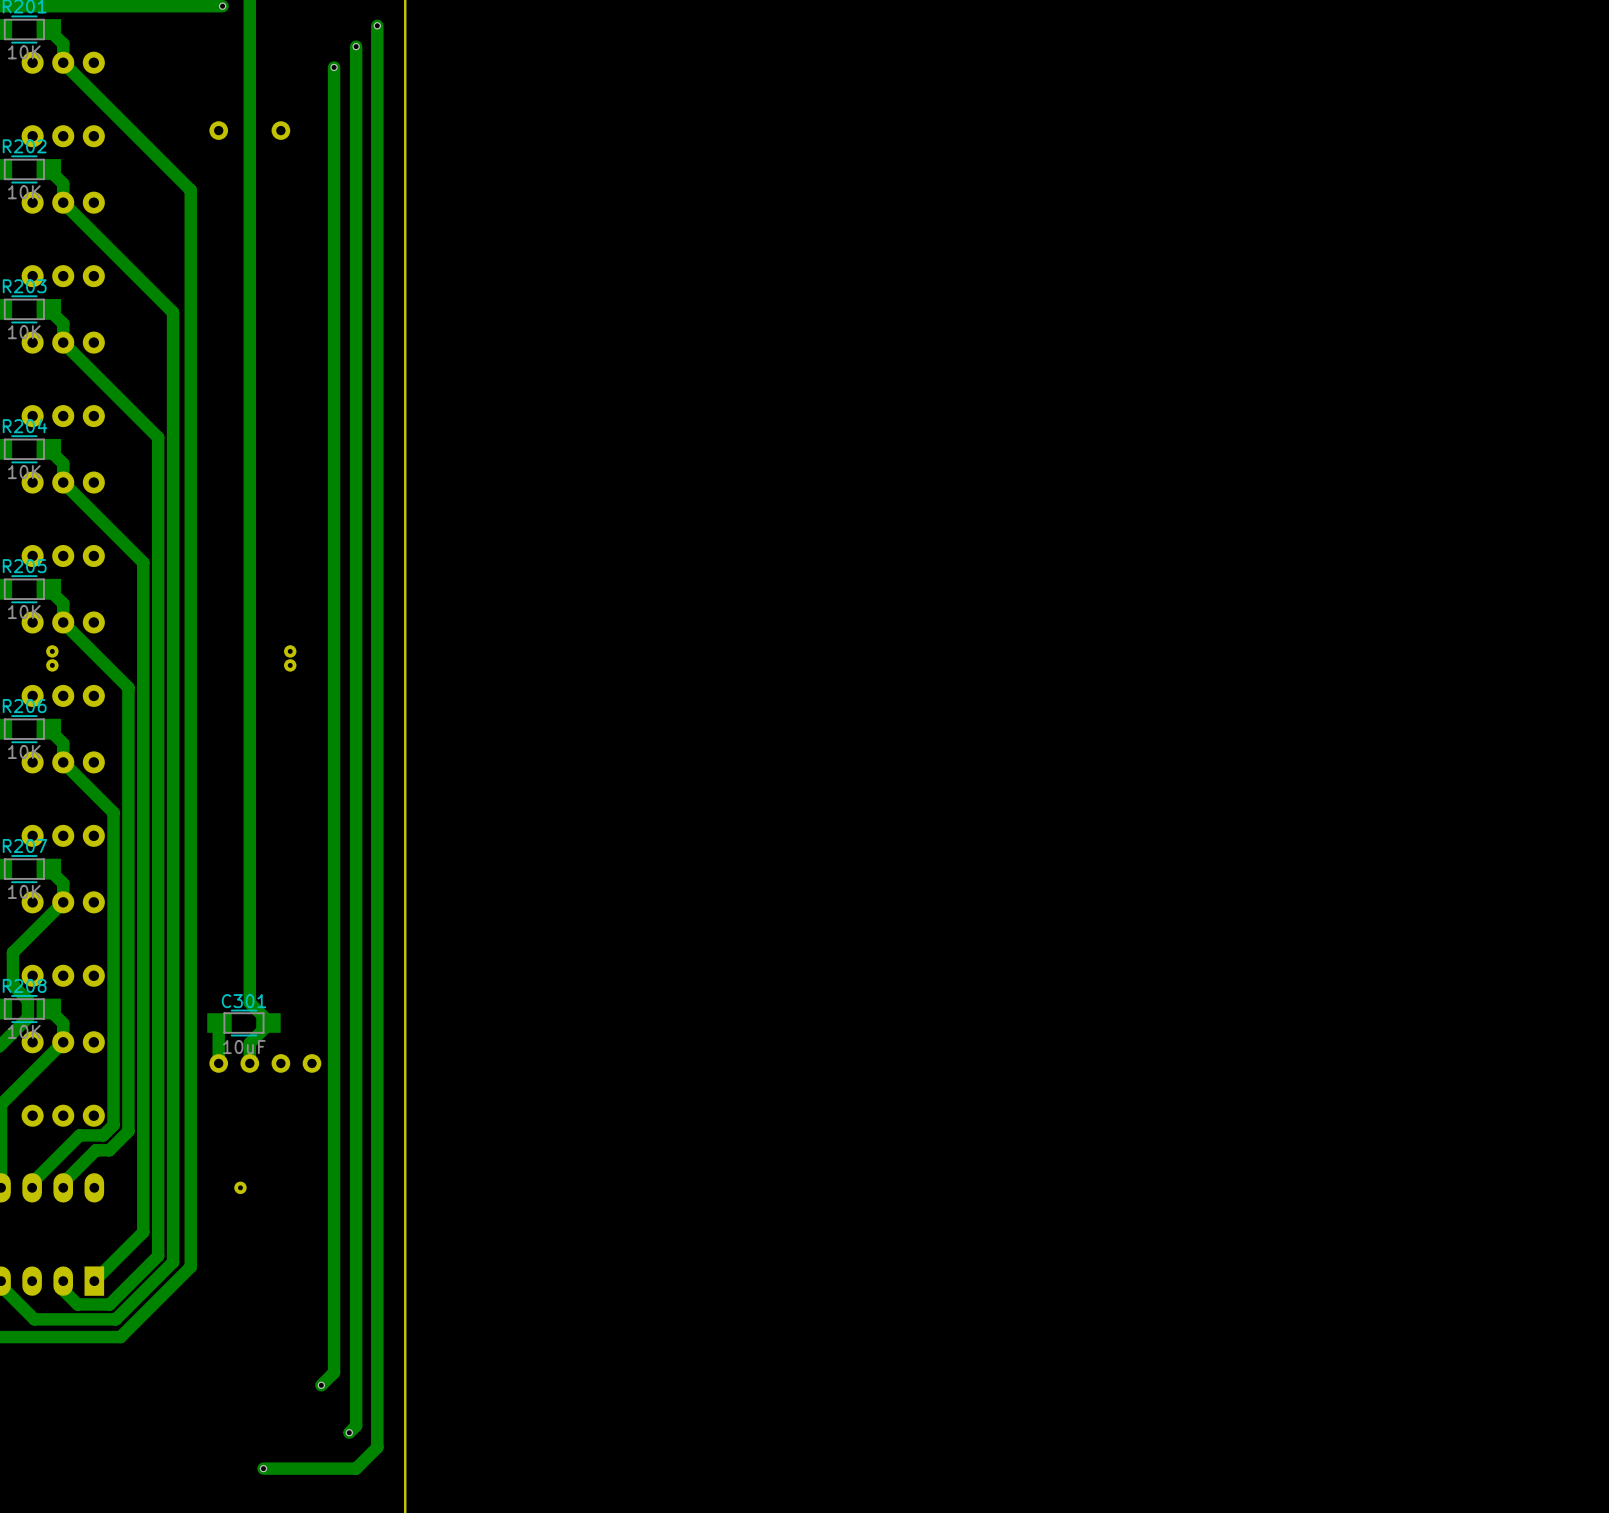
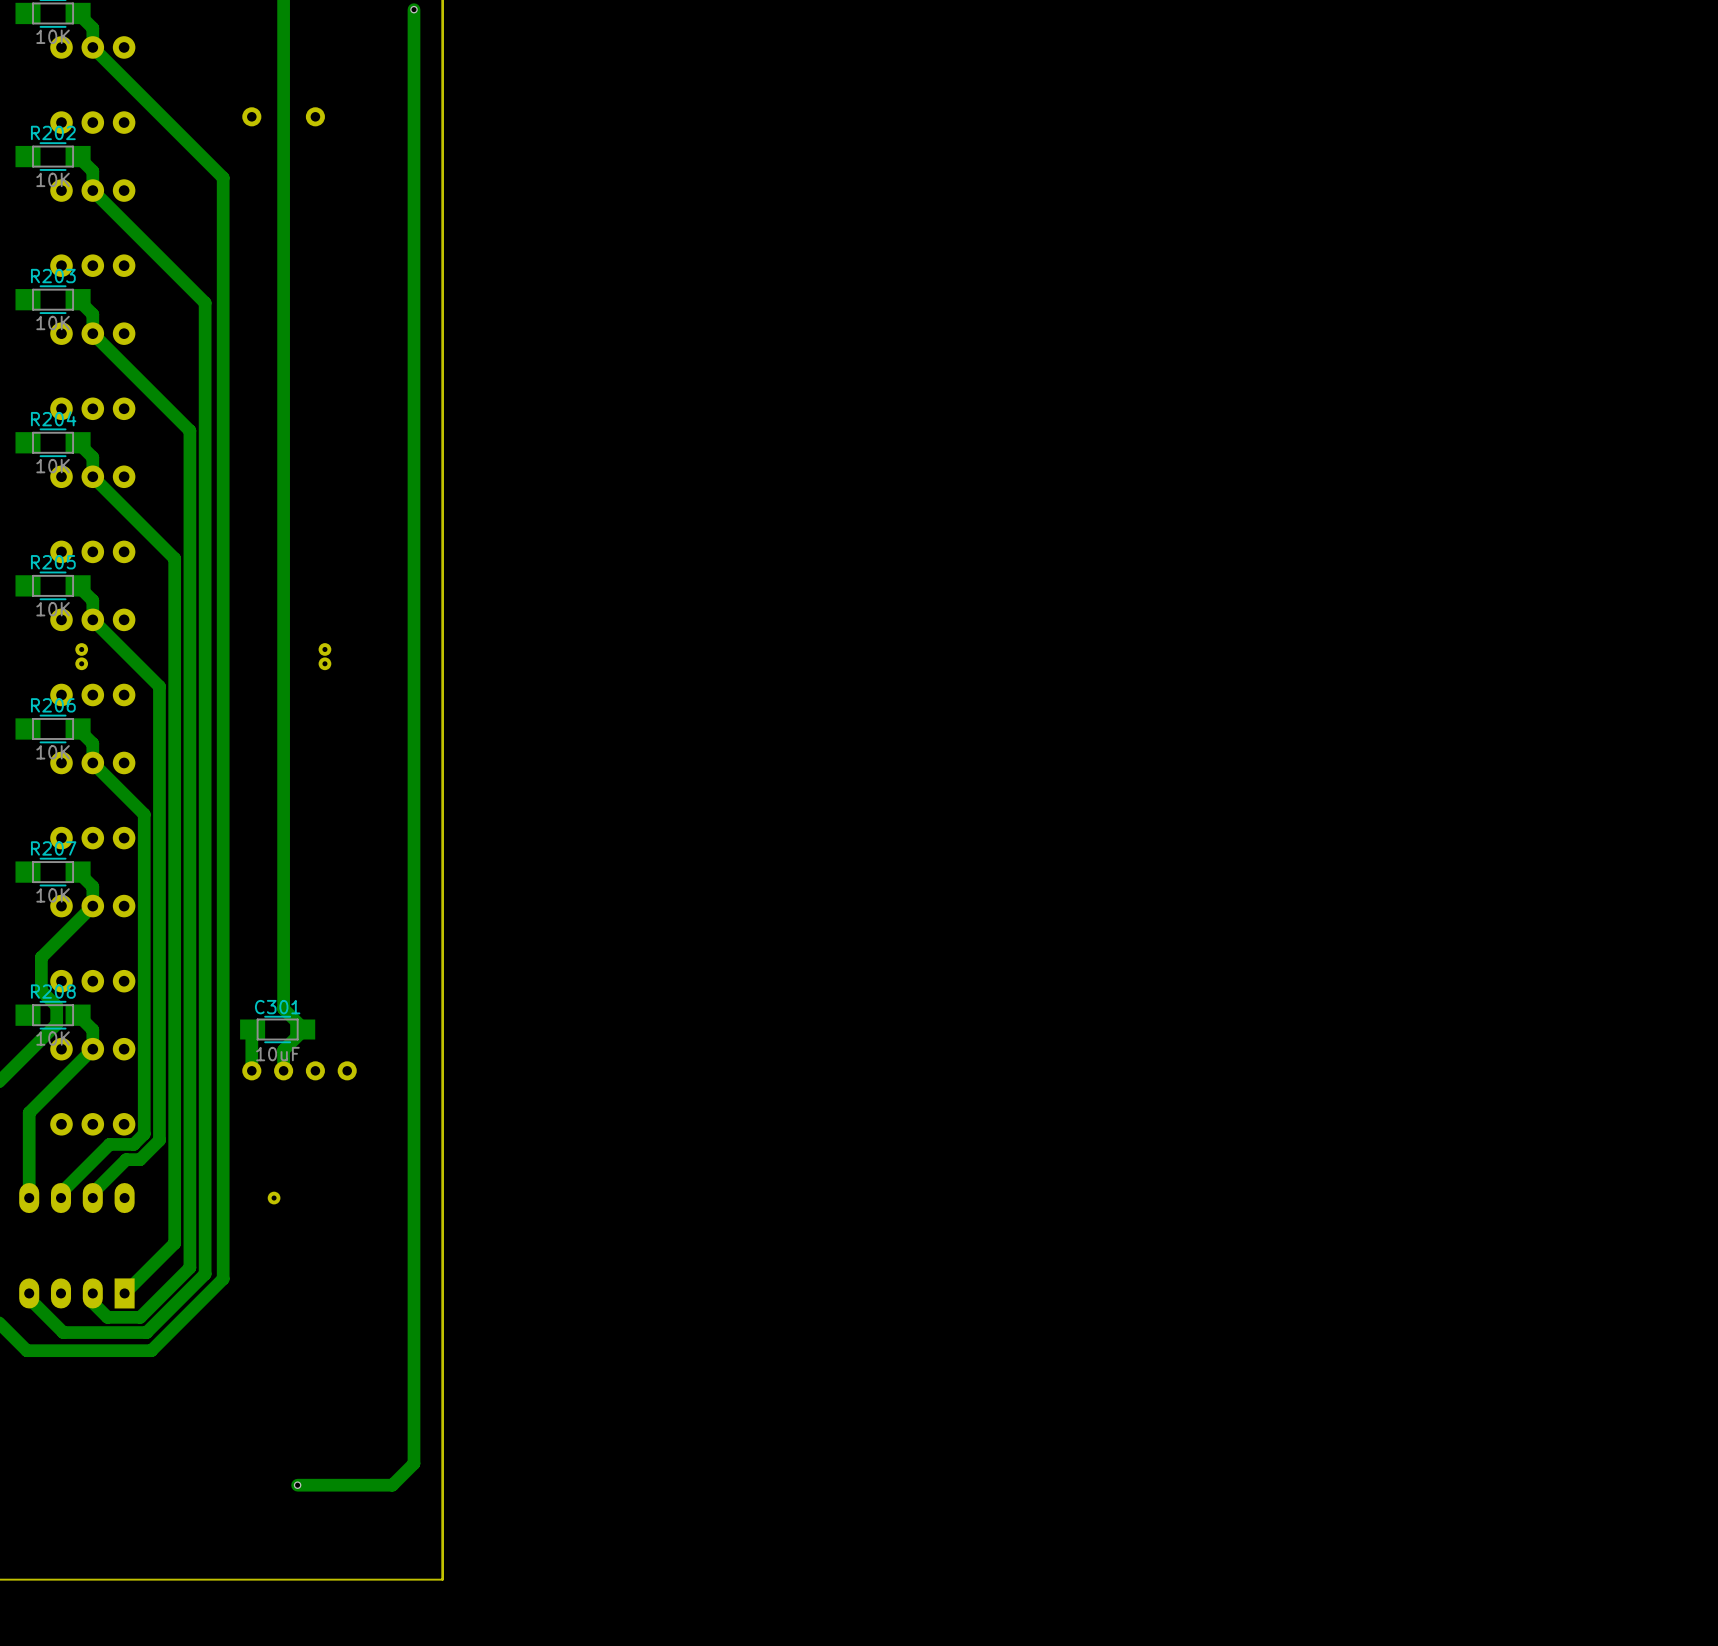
track: (356, 46) (356, 1425) (349, 1432) -> none
via: (356, 46) -> none
track: (334, 67) (334, 1372) (321, 1385) -> none
via: (334, 67) -> none
via: (321, 1385) -> none
via: (349, 1432) -> none

